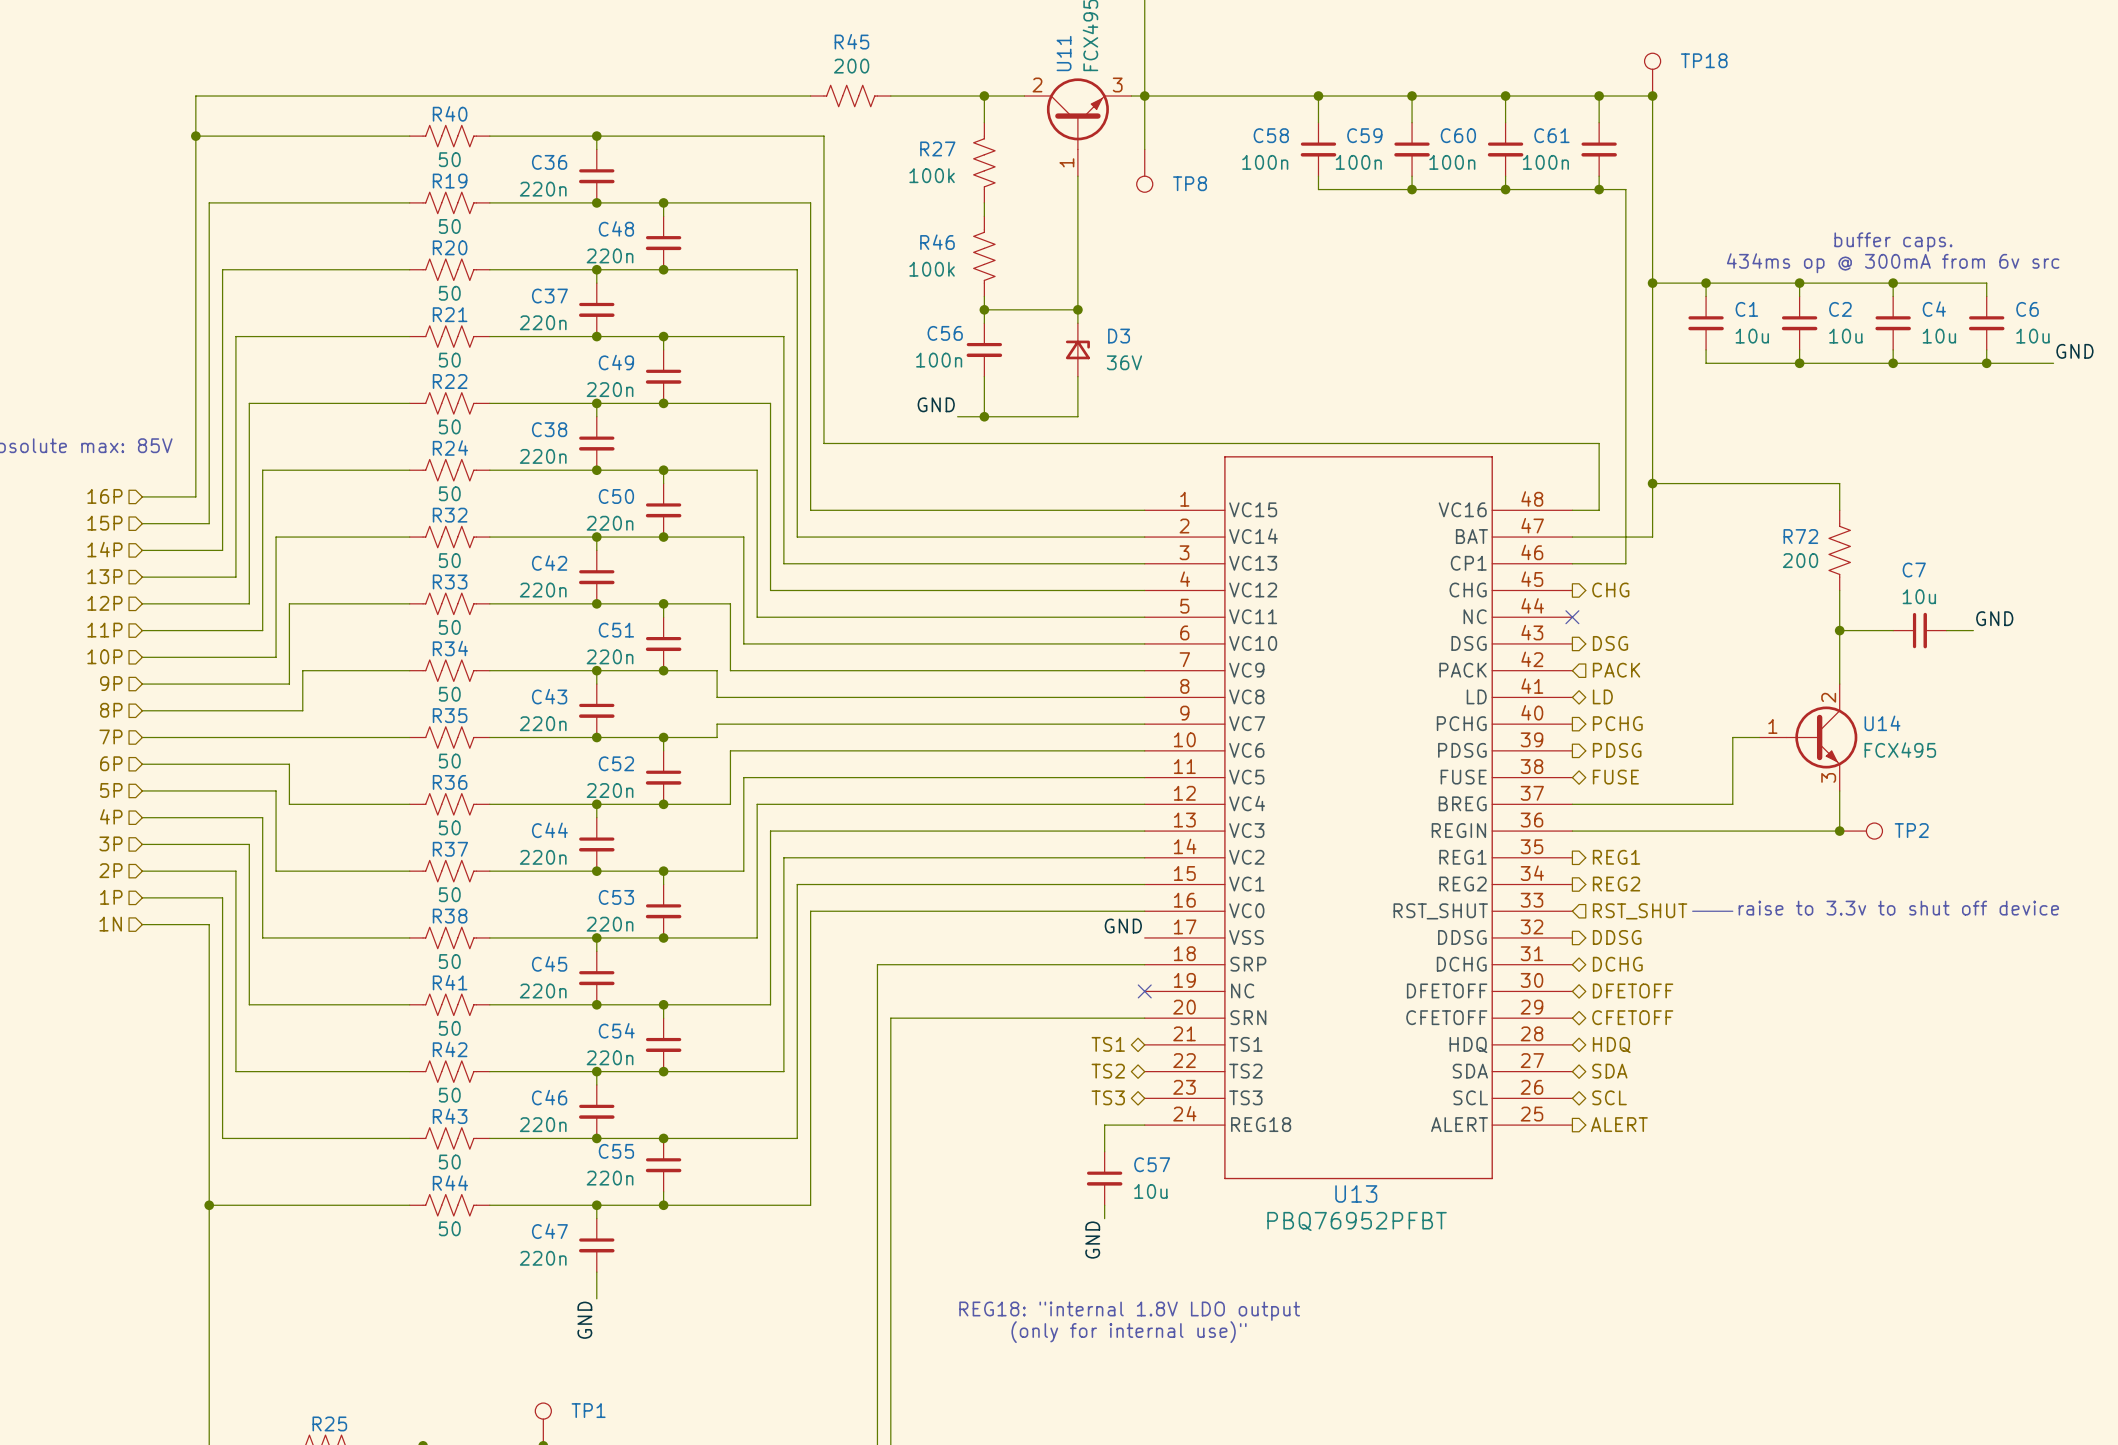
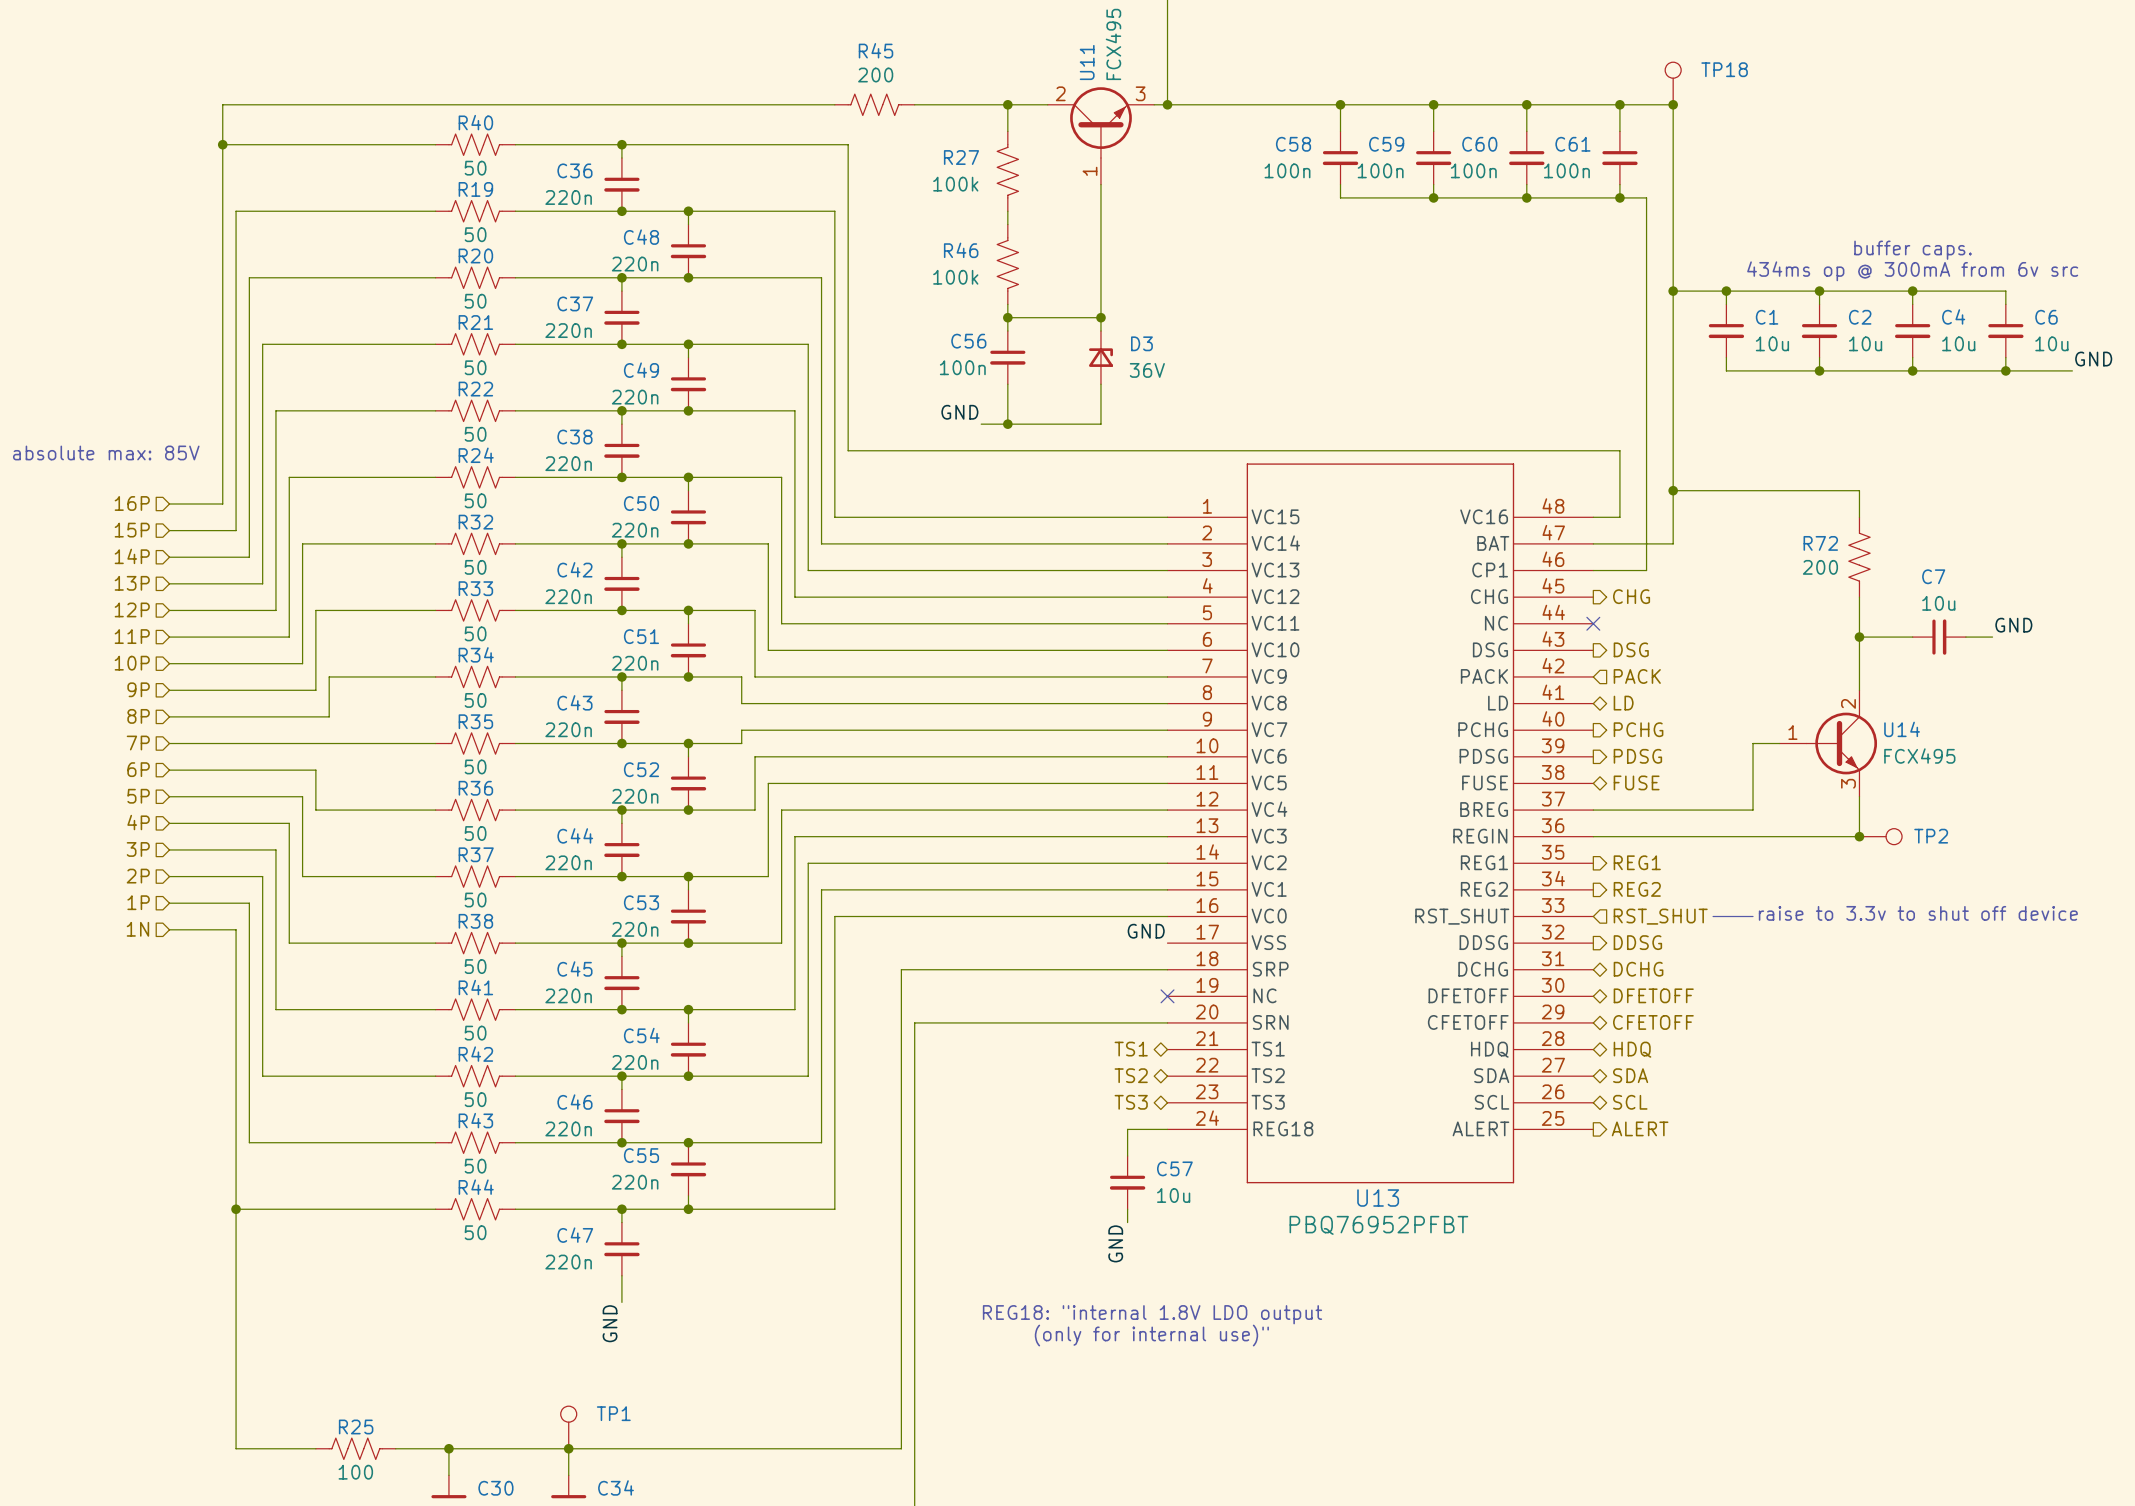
wire: (1144, 96) (1144, 149) -> none
TP8: (1144, 170) -> none

